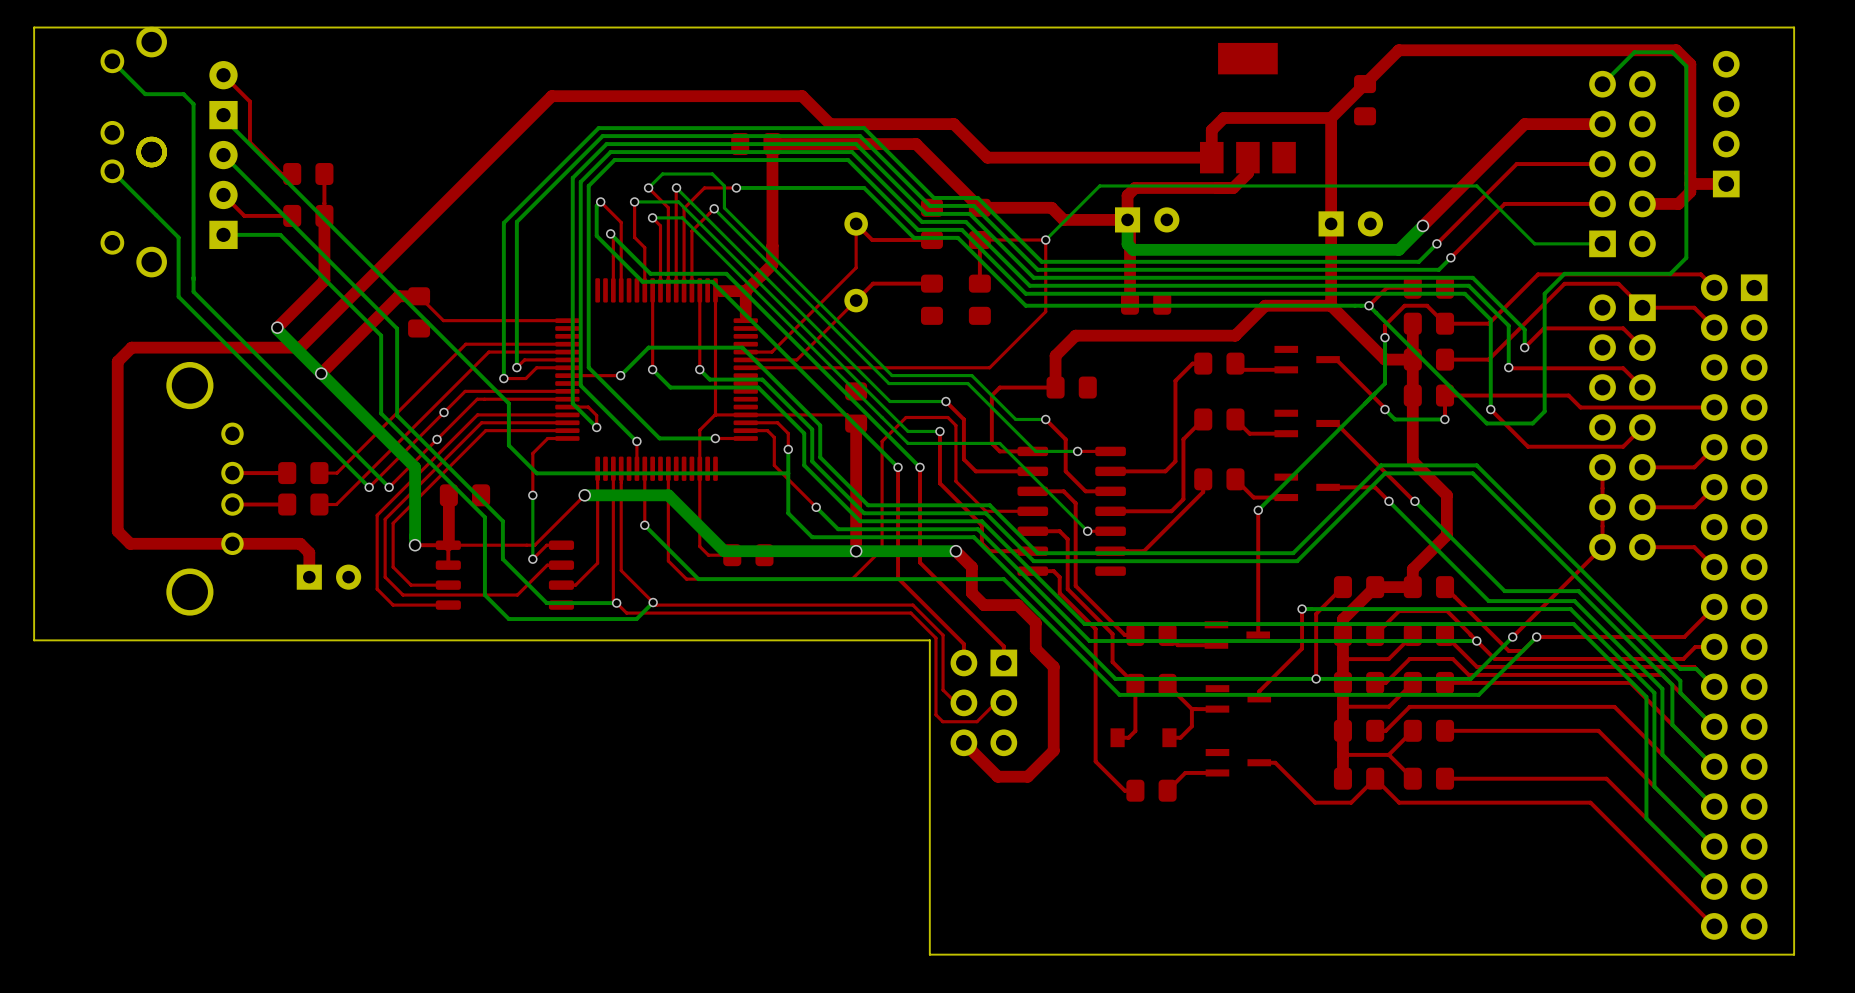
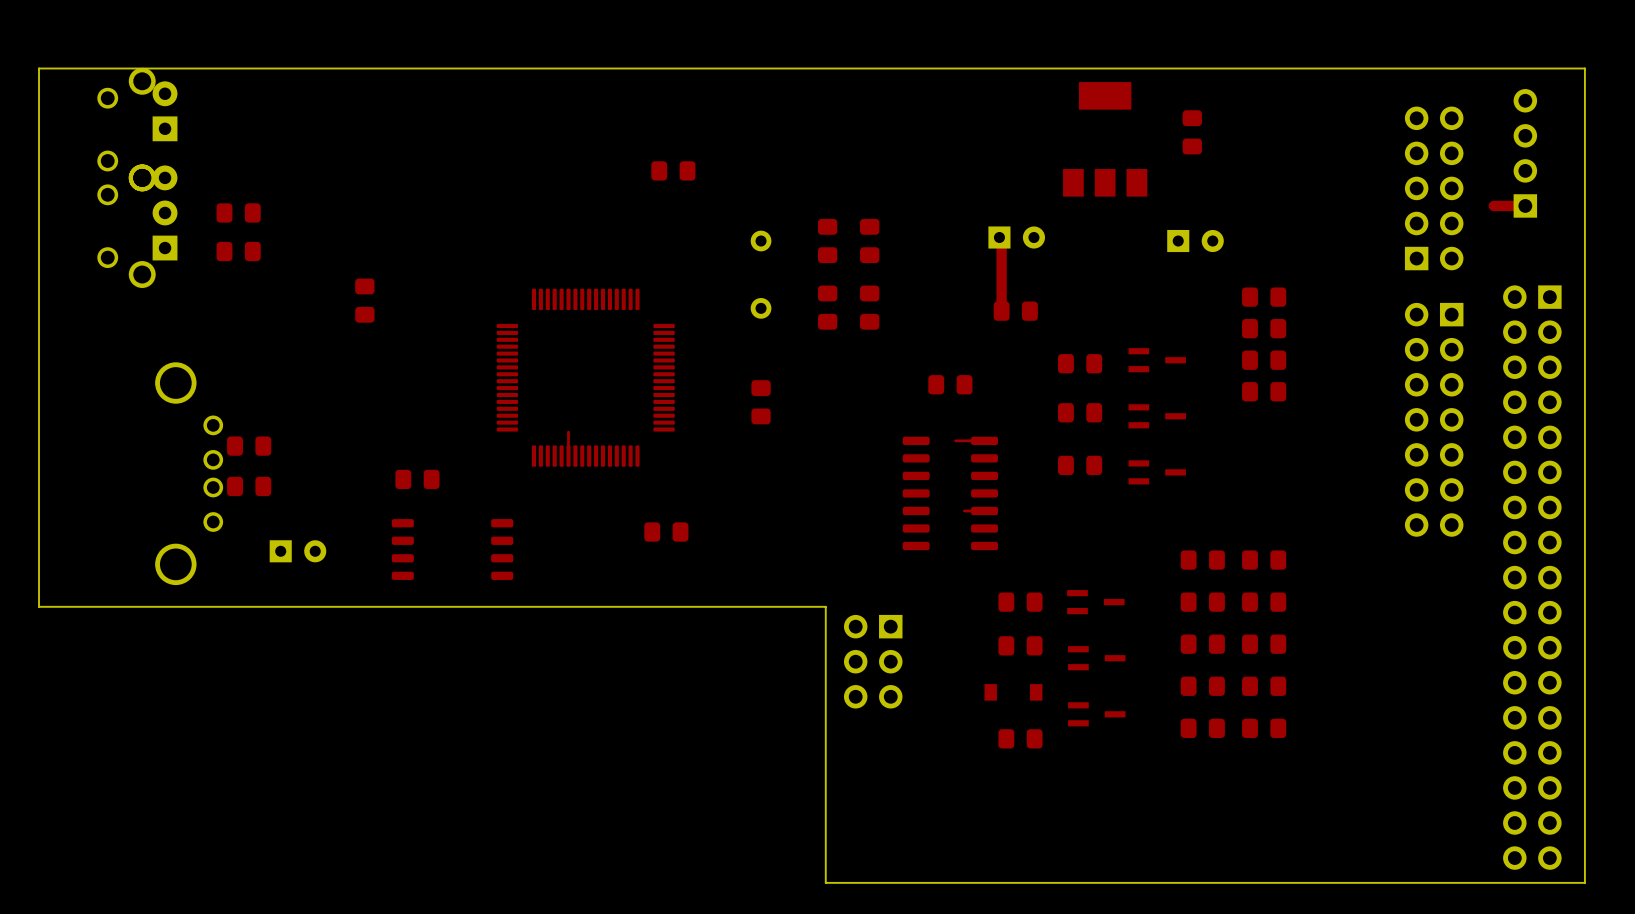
bottom track: (112, 61) (145, 94) (183, 94) (193, 104) (193, 291) (389, 487) -> none
top track: (223, 75) (249, 101) (249, 142) (281, 174) (292, 174) -> none
bottom track: (1602, 84) (1634, 52) (1672, 52) (1686, 66) (1686, 257) (1670, 273) (1564, 273) (1544, 293) (1544, 411) (1532, 423) (1486, 423) (1369, 305) (1025, 305) (957, 237) (914, 237) (864, 187) (736, 187) -> none
part position: (223, 95) -> (165, 111)
part position: (1365, 100) -> (1192, 132)
bottom track: (223, 115) (223, 118) (508, 403) (508, 445) (536, 473) (788, 473) -> none
top track: (1331, 117) (1398, 50) (1676, 50) (1690, 64) (1690, 191) (1678, 203) (1642, 203) -> none
top track: (1331, 117) (1331, 305) -> none
top track: (1331, 117) (1223, 117) (1211, 130) (1211, 157) (987, 157) (953, 124) (830, 124) (802, 96) (551, 96) (300, 347) (131, 347) (117, 361) (117, 531) (130, 543) (300, 543) (309, 552) (309, 577) -> none
top track: (1602, 124) (1524, 124) (1422, 225) -> none
bottom track: (223, 155) (397, 328) (397, 415) (502, 521) (502, 559) (546, 603) (616, 603) -> none
top track: (1247, 157) (1247, 173) (1233, 187) (1135, 187) (1127, 195) (1127, 219) (1063, 219) (1051, 207) (979, 207) (916, 144) (772, 144) (772, 264) (745, 291) -> none
top track: (1602, 164) (1516, 164) (1436, 243) -> none
bottom track: (112, 171) (178, 237) (178, 296) (369, 487) -> none
part: (308, 174) -> none
top track: (324, 174) (324, 280) (277, 327) -> none
top track: (648, 187) (668, 207) (668, 290) -> none
bottom track: (648, 187) (662, 174) (712, 174) (724, 185) (724, 207) (892, 375) (971, 375) (1015, 419) (1045, 419) -> none
via: (648, 187) -> none
top track: (676, 187) (676, 290) -> none
bottom track: (676, 187) (890, 401) (945, 401) -> none
via: (676, 187) -> none
top track: (736, 187) (704, 187) (684, 208) (684, 290) -> none
via: (736, 187) -> none
part: none -> (238, 212)
top track: (223, 194) (244, 215) (292, 215) -> none
part position: (223, 194) -> (165, 212)
top track: (600, 201) (621, 222) (621, 290) -> none
bottom track: (600, 201) (596, 205) (596, 235) (642, 281) (712, 281) (898, 467) -> none
via: (600, 201) -> none
top track: (634, 201) (634, 237) (644, 247) (644, 290) -> none
bottom track: (634, 201) (678, 201) (908, 431) (939, 431) -> none
via: (634, 201) -> none
top track: (1602, 203) (1504, 203) (1450, 257) -> none
top track: (714, 208) (691, 231) (691, 290) -> none
bottom track: (714, 208) (888, 383) (967, 383) (1035, 451) (1077, 451) -> none
via: (714, 208) -> none
part: (308, 215) -> none
top track: (652, 217) (660, 225) (660, 290) -> none
bottom track: (652, 217) (682, 217) (908, 443) (999, 443) (1087, 531) -> none
via: (652, 217) -> none
bottom track: (1127, 219) (1127, 244) (1133, 249) (1398, 249) (1422, 225) -> none
via: (1422, 225) -> none
top track: (610, 233) (613, 236) (613, 290) -> none
bottom track: (610, 233) (650, 273) (726, 273) (920, 467) -> none
via: (610, 233) -> none
bottom track: (223, 234) (280, 234) (381, 335) (381, 413) (484, 517) (484, 595) (508, 619) (636, 619) (653, 602) -> none
part: none -> (238, 251)
top track: (1045, 239) (1045, 311) (989, 367) (745, 367) -> none
top track: (931, 240) (872, 240) (856, 223) (856, 267) (771, 352) (745, 352) -> none
top track: (1045, 240) (979, 240) (979, 283) -> none
bottom track: (1045, 240) (1099, 185) (1476, 185) (1534, 243) (1602, 243) -> none
via: (1045, 240) -> none
bottom track: (1436, 243) (1418, 261) (1041, 261) (977, 197) (933, 197) (864, 128) (598, 128) (503, 222) (503, 378) -> none
via: (1436, 243) -> none
bottom track: (1450, 257) (1438, 269) (1037, 269) (973, 205) (929, 205) (860, 136) (602, 136) (516, 221) (516, 367) -> none
via: (1450, 257) -> none
top track: (931, 283) (873, 283) (796, 359) (745, 359) -> none
top track: (1412, 287) (1387, 287) (1369, 305) -> none
top track: (1714, 287) (1700, 274) (1538, 274) (1488, 323) (1445, 323) (1427, 305) (1404, 305) (1385, 325) (1385, 337) -> none
top track: (652, 290) (652, 369) -> none
top track: (699, 290) (699, 369) -> none
top track: (715, 290) (715, 414) -> none
top track: (745, 291) (719, 291) -> none
top track: (745, 291) (745, 316) -> none
top track: (1331, 305) (1385, 359) (1412, 359) -> none
top track: (1331, 305) (1265, 305) (1235, 335) (1075, 335) (1055, 355) (1055, 387) (999, 387) (991, 395) (991, 443) (999, 451) (1032, 451) -> none
via: (1369, 305) -> none
part position: (419, 312) -> (364, 300)
top track: (567, 320) (443, 320) (419, 296) (398, 296) (321, 373) -> none
top track: (1412, 323) (1412, 461) (1446, 495) (1446, 535) (1412, 569) (1412, 587) (1375, 587) (1342, 619) (1342, 778) -> none
bottom track: (277, 327) (415, 467) (415, 545) -> none
via: (277, 327) -> none
top track: (1714, 327) (1694, 307) (1642, 307) (1618, 283) (1564, 283) (1488, 359) (1445, 359) -> none
bottom track: (1385, 337) (1385, 383) (1258, 510) -> none
via: (1385, 337) -> none
top track: (567, 344) (465, 344) (336, 473) (319, 473) -> none
bottom track: (648, 347) (742, 347) (820, 425) (820, 457) (868, 505) (989, 505) (1037, 553) (1293, 553) (1381, 465) (1476, 465) (1680, 668) (1696, 668) (1714, 686) -> none
bottom track: (648, 347) (620, 375) -> none
bottom track: (1524, 347) (1524, 329) (1472, 277) (1033, 277) (969, 213) (925, 213) (856, 144) (606, 144) (572, 178) (572, 403) (596, 427) -> none
via: (1524, 347) -> none
top track: (1642, 347) (1623, 328) (1543, 328) (1524, 347) -> none
top track: (567, 352) (488, 352) (336, 504) (319, 504) -> none
top track: (567, 359) (524, 359) (516, 367) -> none
top track: (1328, 359) (1336, 359) (1385, 409) -> none
top track: (1203, 363) (1192, 363) (1175, 380) (1175, 461) (1165, 471) (1110, 471) -> none
top track: (1235, 363) (1241, 369) (1286, 369) -> none
via: (516, 367) -> none
top track: (567, 367) (536, 367) (525, 378) (503, 378) -> none
top track: (1508, 367) (1623, 368) (1642, 387) -> none
bottom track: (1508, 367) (1508, 325) (1468, 285) (1029, 285) (965, 221) (922, 221) (852, 152) (610, 152) (580, 181) (580, 385) (636, 441) -> none
via: (1508, 367) -> none
bottom track: (652, 369) (670, 387) (758, 387) (804, 433) (804, 465) (860, 521) (981, 521) (1084, 624) (1573, 624) (1646, 696) (1646, 818) (1714, 886) -> none
via: (652, 369) -> none
bottom track: (699, 369) (709, 379) (762, 379) (812, 429) (812, 461) (864, 513) (985, 513) (1033, 561) (1297, 561) (1385, 473) (1472, 473) (1680, 680) (1680, 692) (1714, 726) -> none
via: (699, 369) -> none
via: (321, 373) -> none
top track: (620, 375) (567, 375) -> none
via: (620, 375) -> none
via: (503, 378) -> none
top track: (567, 391) (465, 391) (369, 487) -> none
top track: (567, 399) (477, 399) (389, 487) -> none
top track: (945, 401) (963, 419) (963, 459) (975, 471) (1032, 471) -> none
via: (945, 401) -> none
top track: (567, 407) (588, 407) (596, 415) (596, 427) -> none
top track: (1714, 407) (1580, 407) (1568, 395) (1445, 395) (1445, 419) -> none
bottom track: (1385, 409) (1394, 419) (1444, 419) -> none
via: (1385, 409) -> none
top track: (1490, 409) (1527, 446) (1623, 446) (1642, 427) -> none
bottom track: (1490, 409) (1490, 319) (1464, 293) (1025, 293) (961, 229) (918, 229) (848, 160) (614, 160) (588, 185) (588, 367) (659, 438) (715, 438) -> none
via: (1490, 409) -> none
via: (444, 412) -> none
top track: (567, 414) (477, 414) (377, 515) (377, 589) (393, 605) (448, 605) -> none
top track: (1045, 419) (1065, 439) (1065, 471) (1085, 491) (1110, 491) -> none
via: (1045, 419) -> none
top track: (1203, 419) (1183, 439) (1183, 499) (1171, 511) (1110, 511) -> none
top track: (1235, 419) (1249, 433) (1286, 433) -> none
via: (1444, 419) -> none
top track: (567, 422) (481, 422) (385, 519) (385, 577) (403, 595) (517, 595) (547, 565) (561, 565) -> none
top track: (745, 422) (777, 422) (788, 433) (788, 449) -> none
top track: (1328, 423) (1336, 423) (1414, 501) -> none
via: (596, 427) -> none
top track: (567, 430) (485, 430) (393, 523) (393, 567) (411, 585) (448, 585) -> none
top track: (745, 430) (767, 430) (774, 437) (774, 465) (816, 507) -> none
top track: (939, 431) (939, 483) (981, 525) (981, 543) (989, 551) (1032, 551) -> none
via: (939, 431) -> none
top track: (567, 438) (547, 438) (532, 453) (532, 495) -> none
via: (715, 438) -> none
top track: (745, 438) (715, 438) -> none
via: (437, 439) -> none
via: (636, 441) -> none
top track: (1714, 447) (1694, 467) (1642, 467) -> none
bottom track: (788, 449) (788, 513) (812, 537) (973, 537) (1115, 678) (1470, 678) (1512, 637) -> none
via: (788, 449) -> none
via: (1077, 451) -> none
part: none -> (249, 446)
top track: (898, 467) (898, 578) (963, 644) (963, 662) -> none
via: (898, 467) -> none
top track: (920, 467) (920, 562) (1003, 646) (1003, 662) -> none
via: (920, 467) -> none
top track: (1602, 467) (1602, 547) (1512, 637) -> none
top track: (597, 468) (597, 563) (575, 585) (561, 585) -> none
top track: (613, 468) (613, 599) (626, 613) (910, 613) (935, 638) (935, 714) (942, 721) (976, 721) (995, 702) -> none
top track: (621, 468) (621, 570) (655, 605) (912, 605) (943, 635) (943, 689) (955, 702) -> none
top track: (644, 468) (644, 525) -> none
top track: (668, 468) (668, 560) (686, 579) (852, 579) (882, 549) (882, 441) (906, 417) (947, 417) (955, 425) (955, 481) (985, 511) (1032, 511) -> none
top track: (287, 473) (232, 473) -> none
part: (303, 473) -> none
top track: (1203, 479) (1203, 491) (1143, 551) (1110, 551) -> none
top track: (1235, 479) (1253, 497) (1286, 497) -> none
via: (369, 487) -> none
via: (389, 487) -> none
top track: (1328, 487) (1375, 487) (1388, 501) -> none
top track: (1714, 487) (1694, 507) (1642, 507) -> none
top track: (1032, 491) (1063, 491) (1075, 503) (1075, 585) (1124, 635) (1135, 635) -> none
top track: (597, 494) (584, 495) (534, 545) (448, 545) -> none
top track: (448, 495) (448, 545) -> none
bottom track: (532, 495) (532, 559) -> none
via: (532, 495) -> none
bottom track: (584, 495) (668, 495) (724, 551) (955, 551) -> none
via: (584, 495) -> none
bottom track: (1388, 501) (1488, 601) (1574, 601) (1662, 688) (1662, 754) (1714, 806) -> none
via: (1388, 501) -> none
bottom track: (1414, 501) (1504, 591) (1578, 591) (1672, 684) (1672, 724) (1714, 766) -> none
via: (1414, 501) -> none
part: none -> (249, 486)
top track: (287, 504) (232, 504) -> none
part: (303, 504) -> none
bottom track: (816, 507) (838, 529) (977, 529) (1089, 641) (1476, 641) -> none
via: (816, 507) -> none
top track: (1258, 510) (1258, 635) -> none
via: (1258, 510) -> none
bottom track: (644, 525) (698, 579) (1003, 579) (1119, 694) (1478, 694) (1536, 637) -> none
via: (644, 525) -> none
top track: (1032, 531) (1059, 531) (1067, 539) (1067, 589) (1112, 634) (1112, 661) (1135, 684) (1135, 730) (1128, 737) (1117, 737) -> none
via: (1087, 531) -> none
via: (415, 545) -> none
top track: (448, 545) (415, 545) -> none
top track: (448, 545) (448, 565) -> none
top track: (561, 545) (546, 545) (532, 559) -> none
top track: (1642, 547) (1694, 547) (1714, 567) -> none
top track: (856, 551) (856, 423) (847, 414) (715, 414) (699, 430) (699, 546) (708, 555) (732, 555) -> none
via: (856, 551) -> none
top track: (955, 551) (971, 567) (971, 593) (983, 605) (1017, 605) (1035, 623) (1035, 648) (1053, 666) (1053, 750) (1027, 776) (997, 776) (963, 742) -> none
via: (955, 551) -> none
via: (532, 559) -> none
top track: (1032, 571) (1053, 571) (1059, 577) (1059, 593) (1095, 629) (1095, 761) (1124, 790) (1135, 790) -> none
top track: (1342, 587) (1316, 613) (1316, 678) -> none
top track: (1445, 587) (1508, 650) (1522, 650) (1536, 637) (1684, 637) (1714, 607) -> none
via: (653, 602) -> none
via: (616, 603) -> none
top track: (1302, 609) (1302, 648) (1259, 691) (1259, 698) -> none
bottom track: (1302, 609) (1570, 609) (1654, 692) (1654, 786) (1714, 846) -> none
via: (1302, 609) -> none
top track: (1470, 634) (1447, 611) (1399, 611) (1375, 635) -> none
top track: (1470, 634) (1494, 658) (1683, 658) (1695, 646) (1714, 646) -> none
top track: (1167, 635) (1177, 645) (1216, 645) -> none
top track: (1412, 635) (1388, 659) (1342, 659) -> none
top track: (1445, 635) (1476, 666) (1694, 666) (1714, 686) -> none
via: (1512, 637) -> none
via: (1536, 637) -> none
via: (1476, 641) -> none
via: (1316, 678) -> none
top track: (1375, 682) (1385, 682) (1409, 658) (1452, 658) (1468, 674) (1662, 674) (1714, 726) -> none
top track: (1412, 682) (1388, 706) (1342, 706) -> none
top track: (1445, 682) (1630, 682) (1714, 766) -> none
top track: (1167, 684) (1191, 709) -> none
top track: (1191, 709) (1191, 726) (1180, 737) (1169, 737) (1169, 735) -> none
top track: (1217, 709) (1191, 709) -> none
top track: (1375, 730) (1385, 730) (1409, 706) (1614, 706) (1714, 806) -> none
top track: (1412, 730) (1388, 754) -> none
top track: (1445, 730) (1598, 730) (1714, 846) -> none
top track: (1342, 754) (1388, 754) (1412, 778) -> none
top track: (1259, 762) (1275, 762) (1315, 802) (1351, 802) (1375, 778) (1399, 802) (1590, 802) (1714, 926) -> none
top track: (1217, 772) (1185, 772) (1167, 790) -> none
top track: (1445, 778) (1606, 778) (1714, 886) -> none

